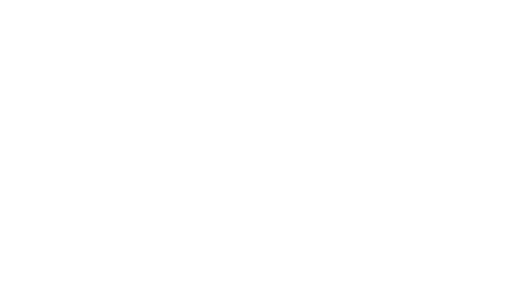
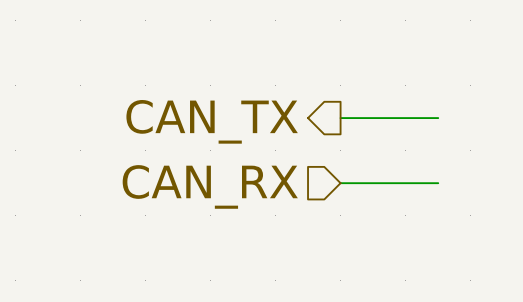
hierarchical label: none -> CAN_TX (212, 121)
wire: none -> (340, 118) (438, 118)
hierarchical label: none -> CAN_RX (210, 186)
wire: none -> (340, 183) (438, 183)

